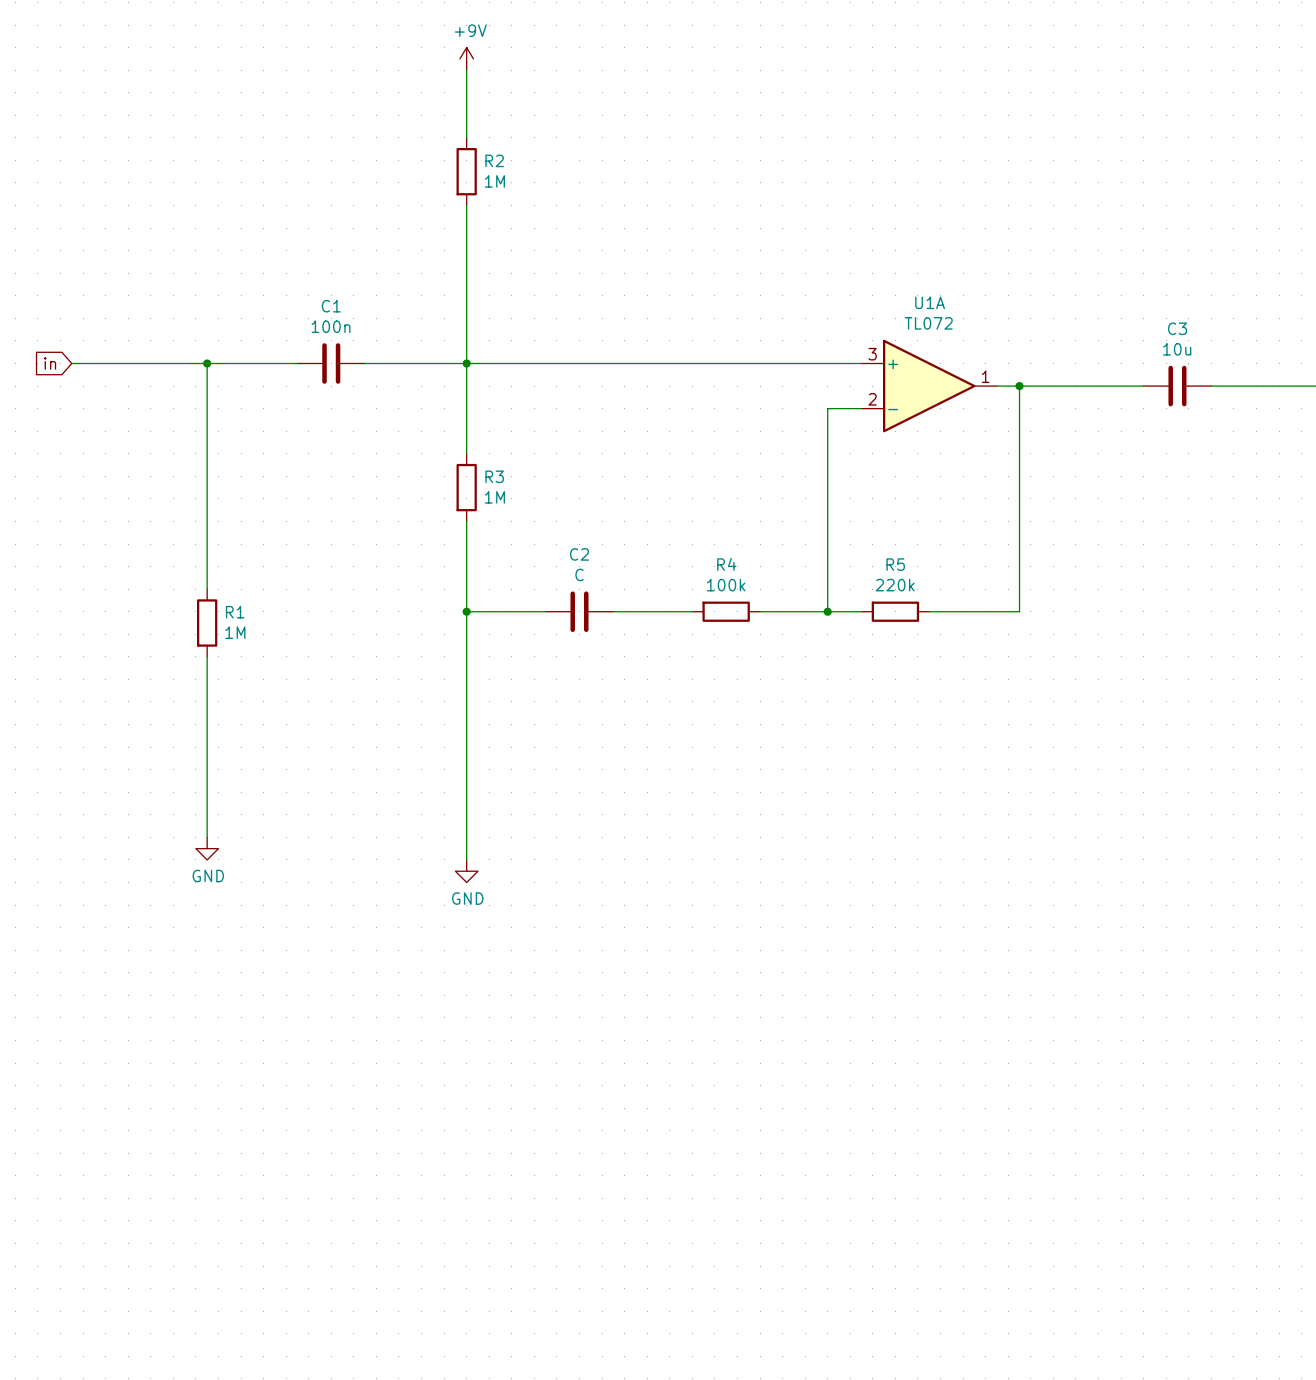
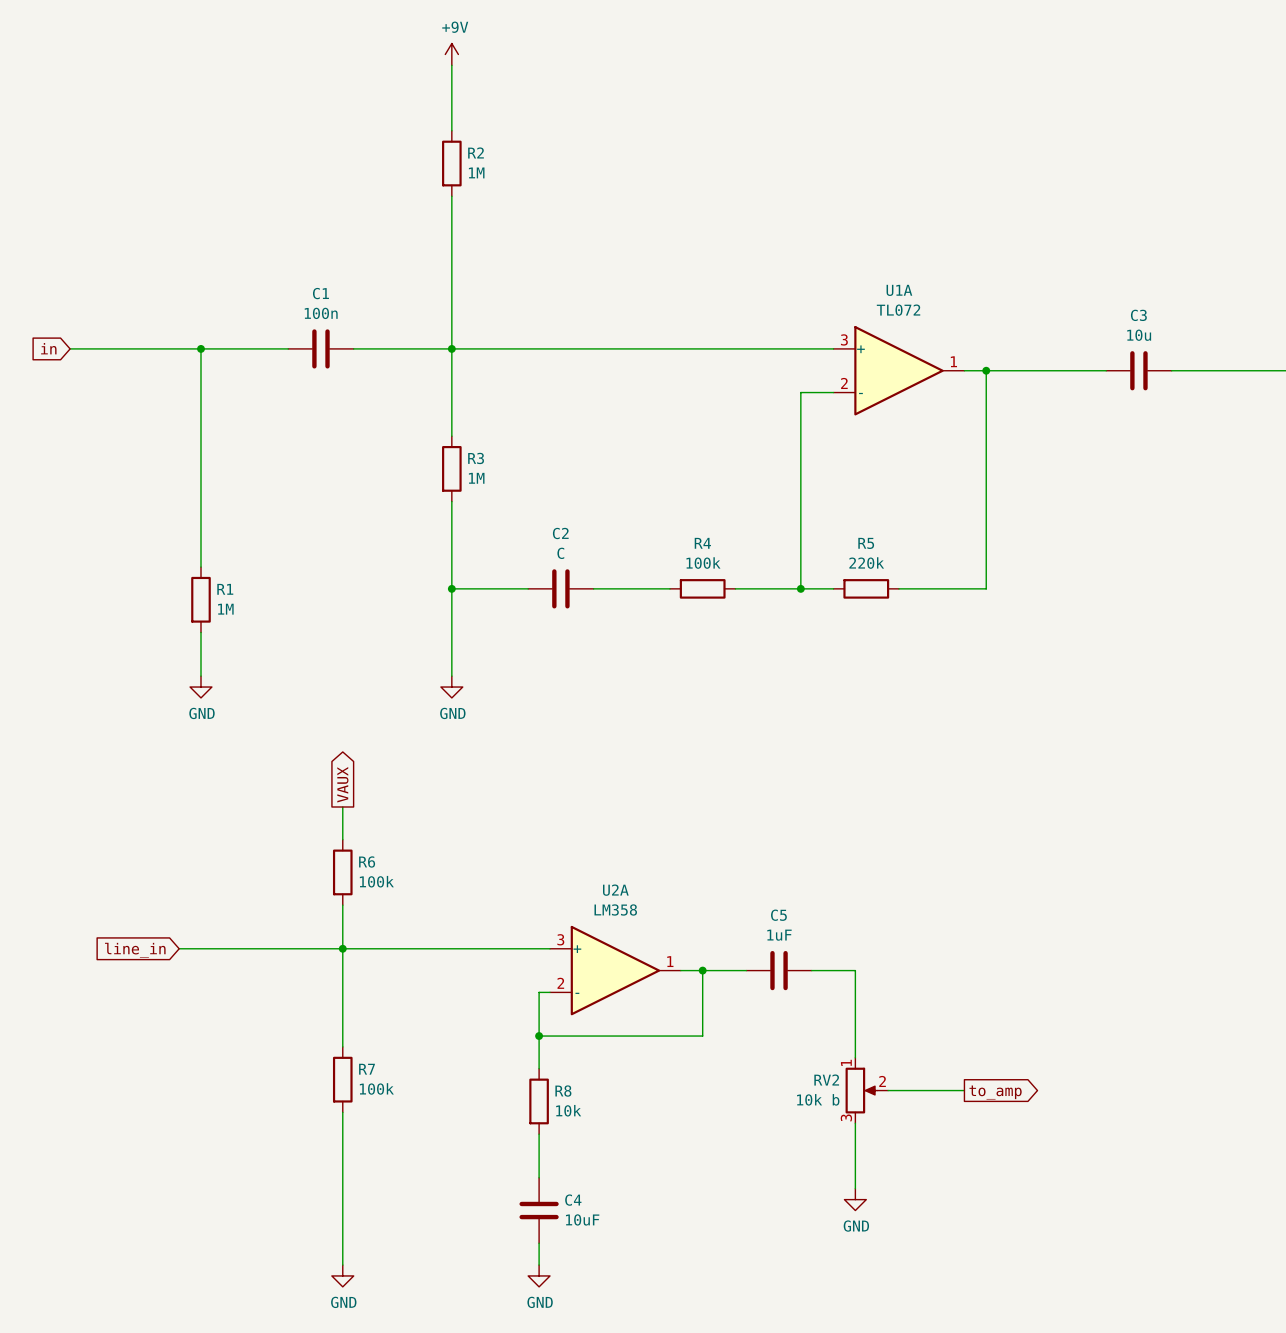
wire: (207, 701) (207, 837) -> none
wire: (466, 701) (466, 859) -> none
power symbol: none -> GND (451, 687)
global label: none -> VAUX (342, 784)
wire: none -> (342, 806) (342, 839)
power symbol position: GND (207, 848) -> GND (200, 687)
power symbol: GND (466, 871) -> none
R6: none -> 100k (342, 872)
wire: none -> (342, 905) (342, 1046)
global label: none -> line_in (135, 950)
wire: none -> (179, 948) (549, 948)
junction: none -> (342, 948)
U2A: none -> LM358 (615, 970)
wire: none -> (680, 970) (746, 970)
wire: none -> (702, 970) (702, 1036) (539, 1036)
junction: none -> (702, 970)
C5: none -> 1uF (779, 970)
wire: none -> (811, 970) (855, 970) (855, 1057)
wire: none -> (549, 992) (539, 992) (539, 1068)
junction: none -> (539, 1036)
R7: none -> 100k (342, 1079)
RV2: none -> 10k b (866, 1090)
wire: none -> (888, 1090) (964, 1090)
global label: none -> to_amp (995, 1092)
R8: none -> 10k (539, 1101)
wire: none -> (342, 1112) (342, 1265)
wire: none -> (855, 1123) (855, 1188)
wire: none -> (539, 1134) (539, 1177)
power symbol: none -> GND (855, 1199)
C4: none -> 10uF (539, 1210)
wire: none -> (539, 1243) (539, 1265)
power symbol: none -> GND (342, 1275)
power symbol: none -> GND (539, 1275)

